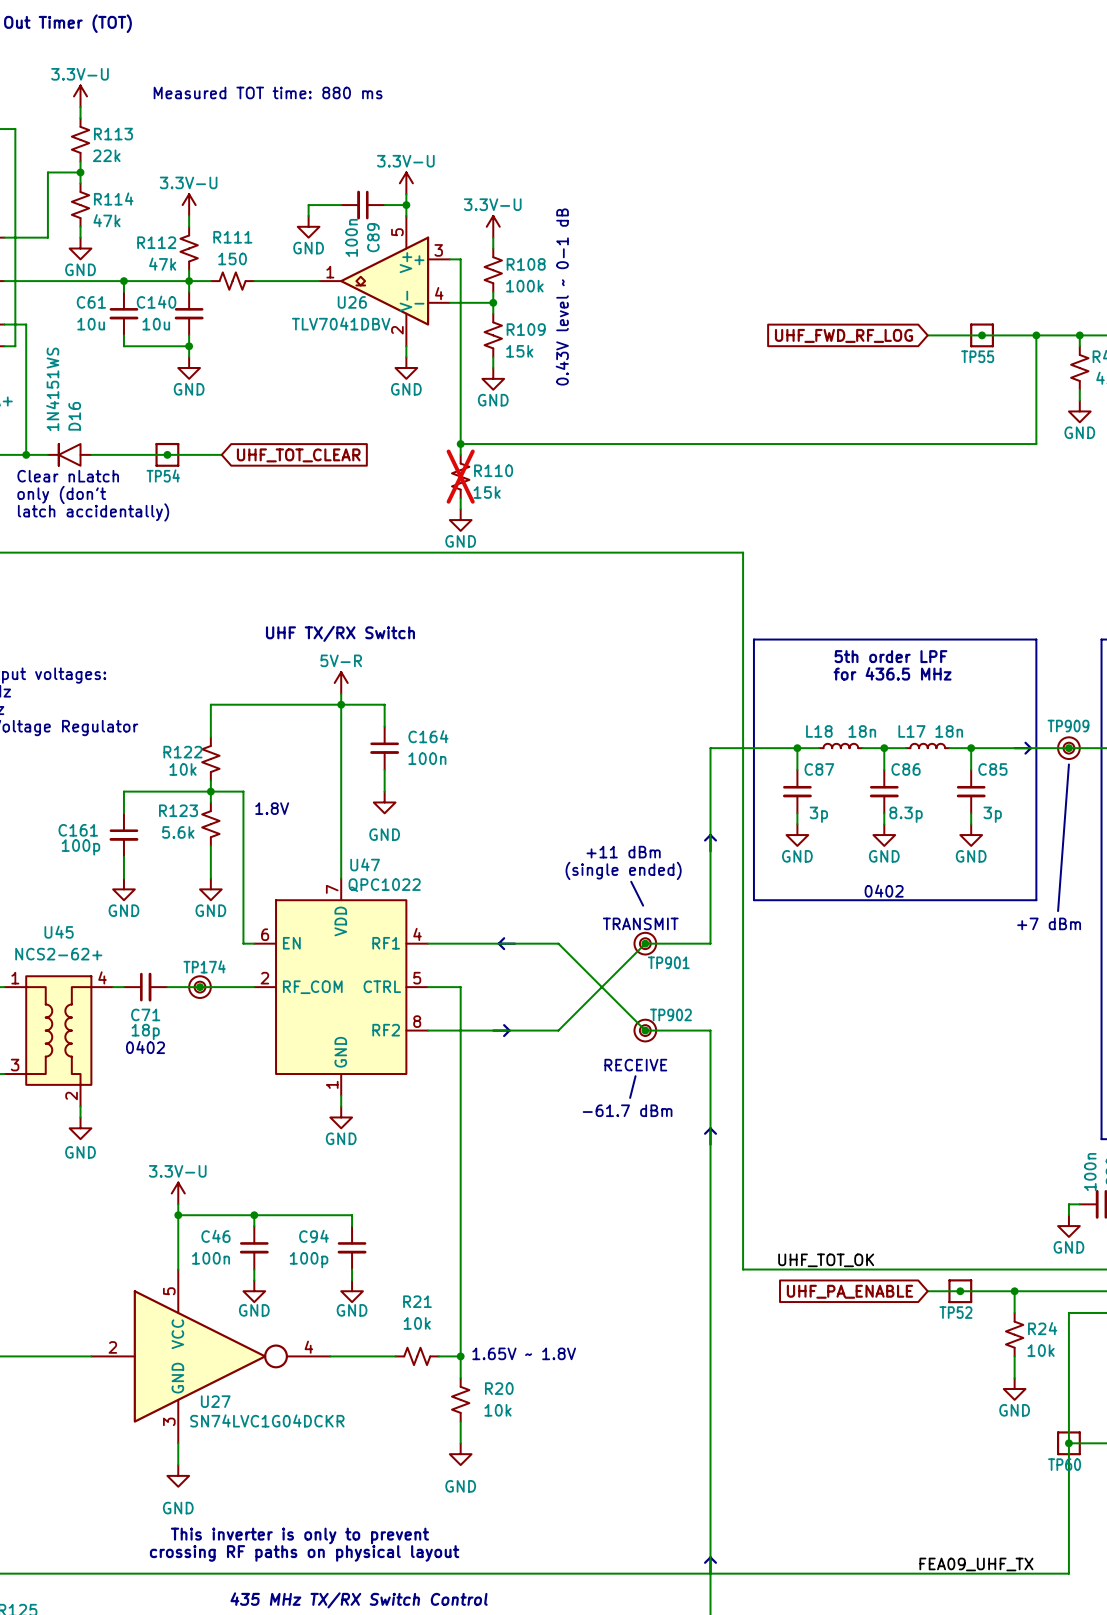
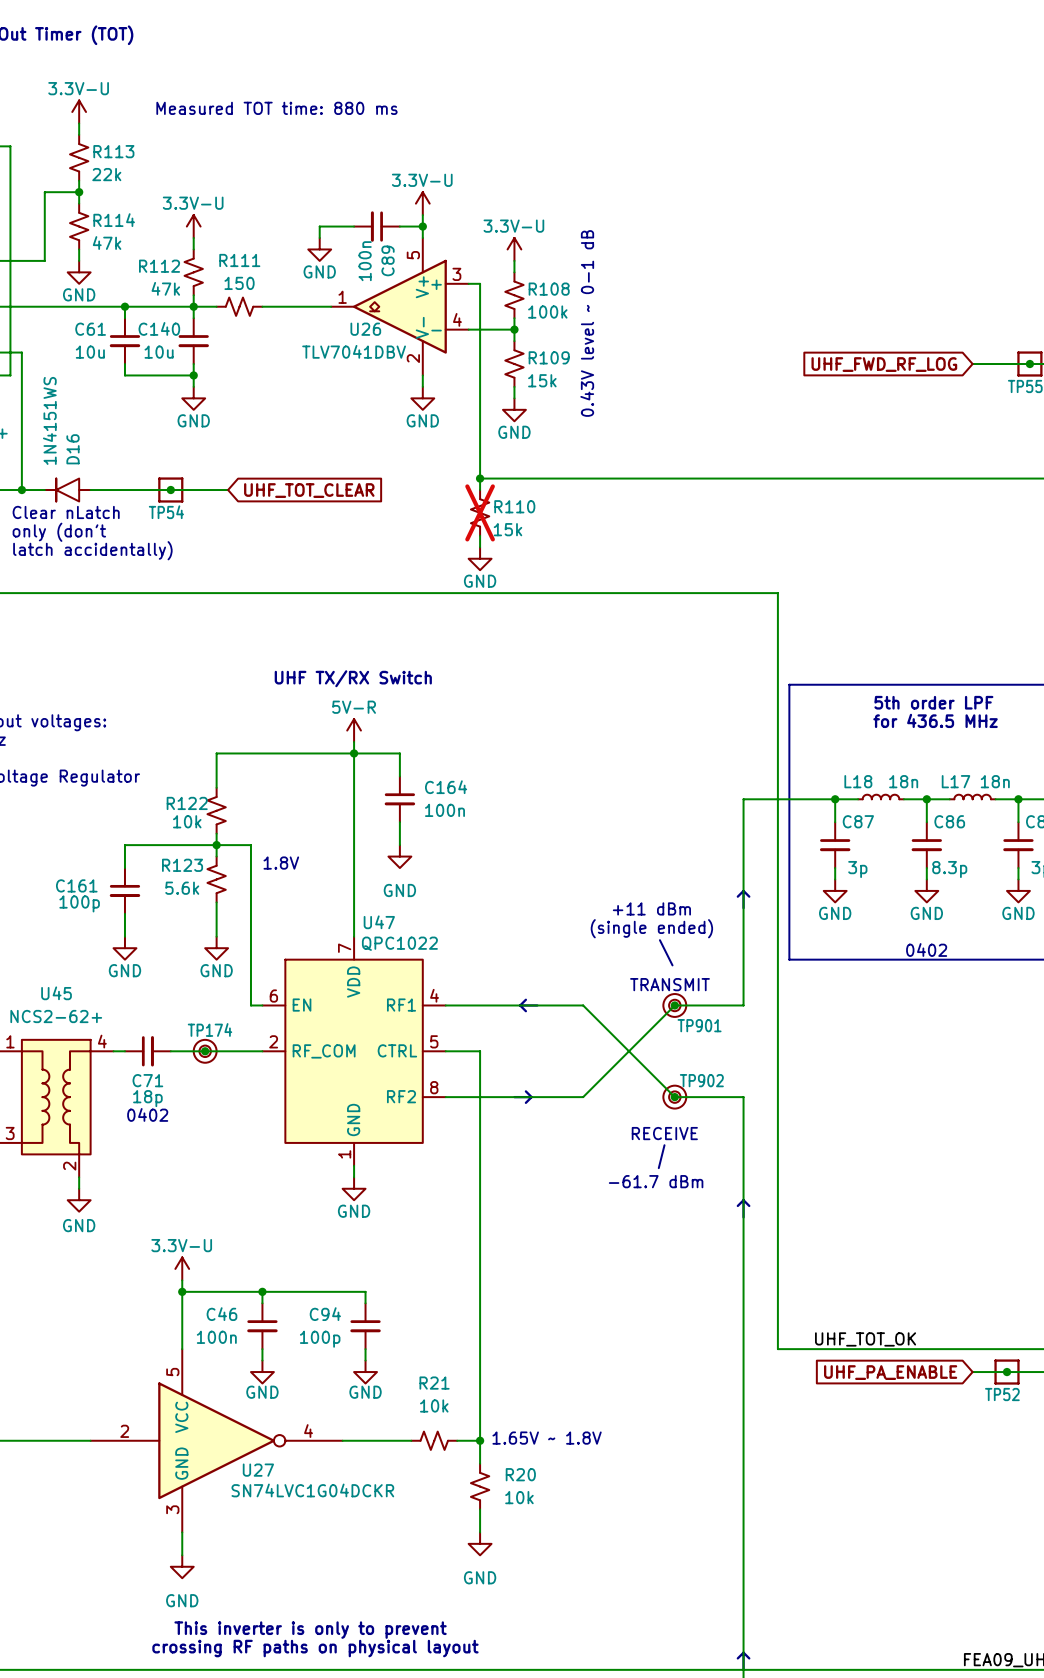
U27 symbol: [91, 1269, 331, 1444] -> [90, 1349, 343, 1533]
U27 name position: U27 (215, 1401) -> U27 (258, 1470)
U27 value position: SN74LVC1G04DCKR (267, 1420) -> SN74LVC1G04DCKR (312, 1490)

